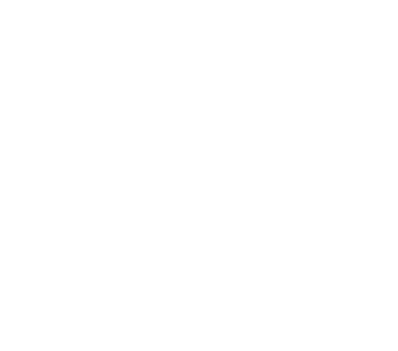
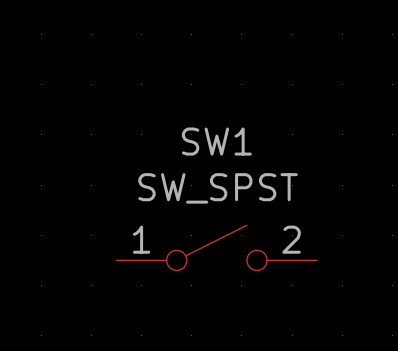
SW1: none -> SW_SPST (216, 247)

